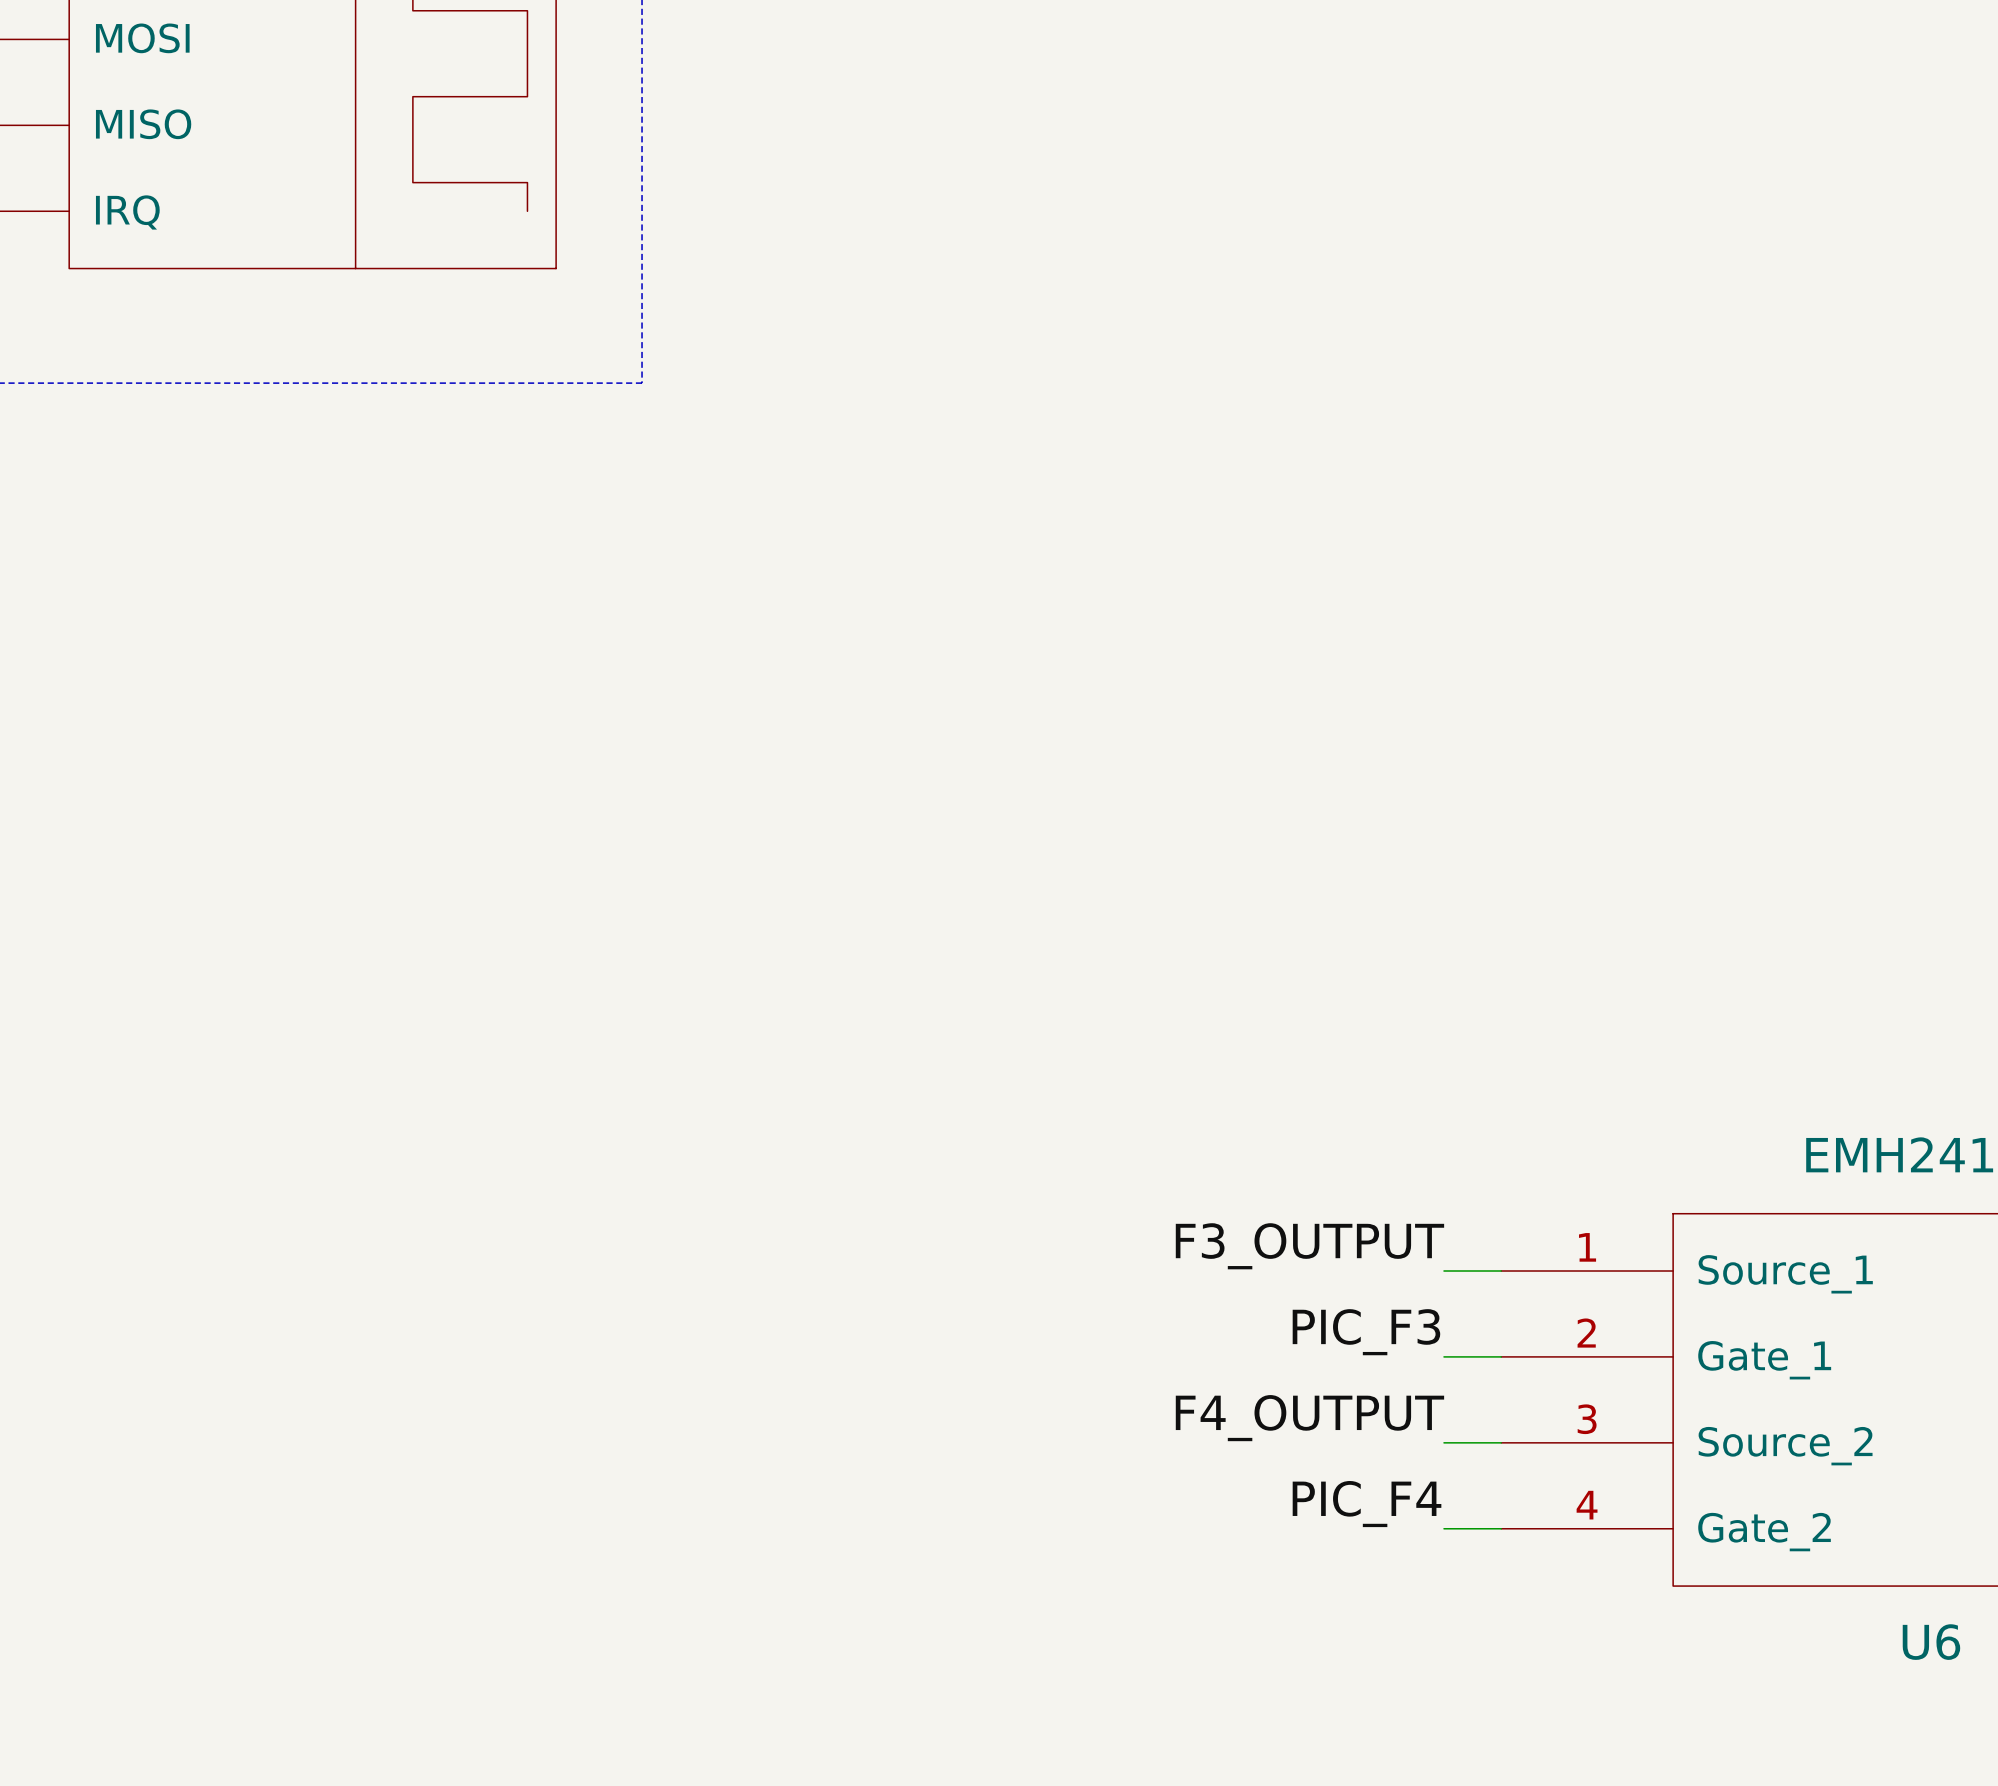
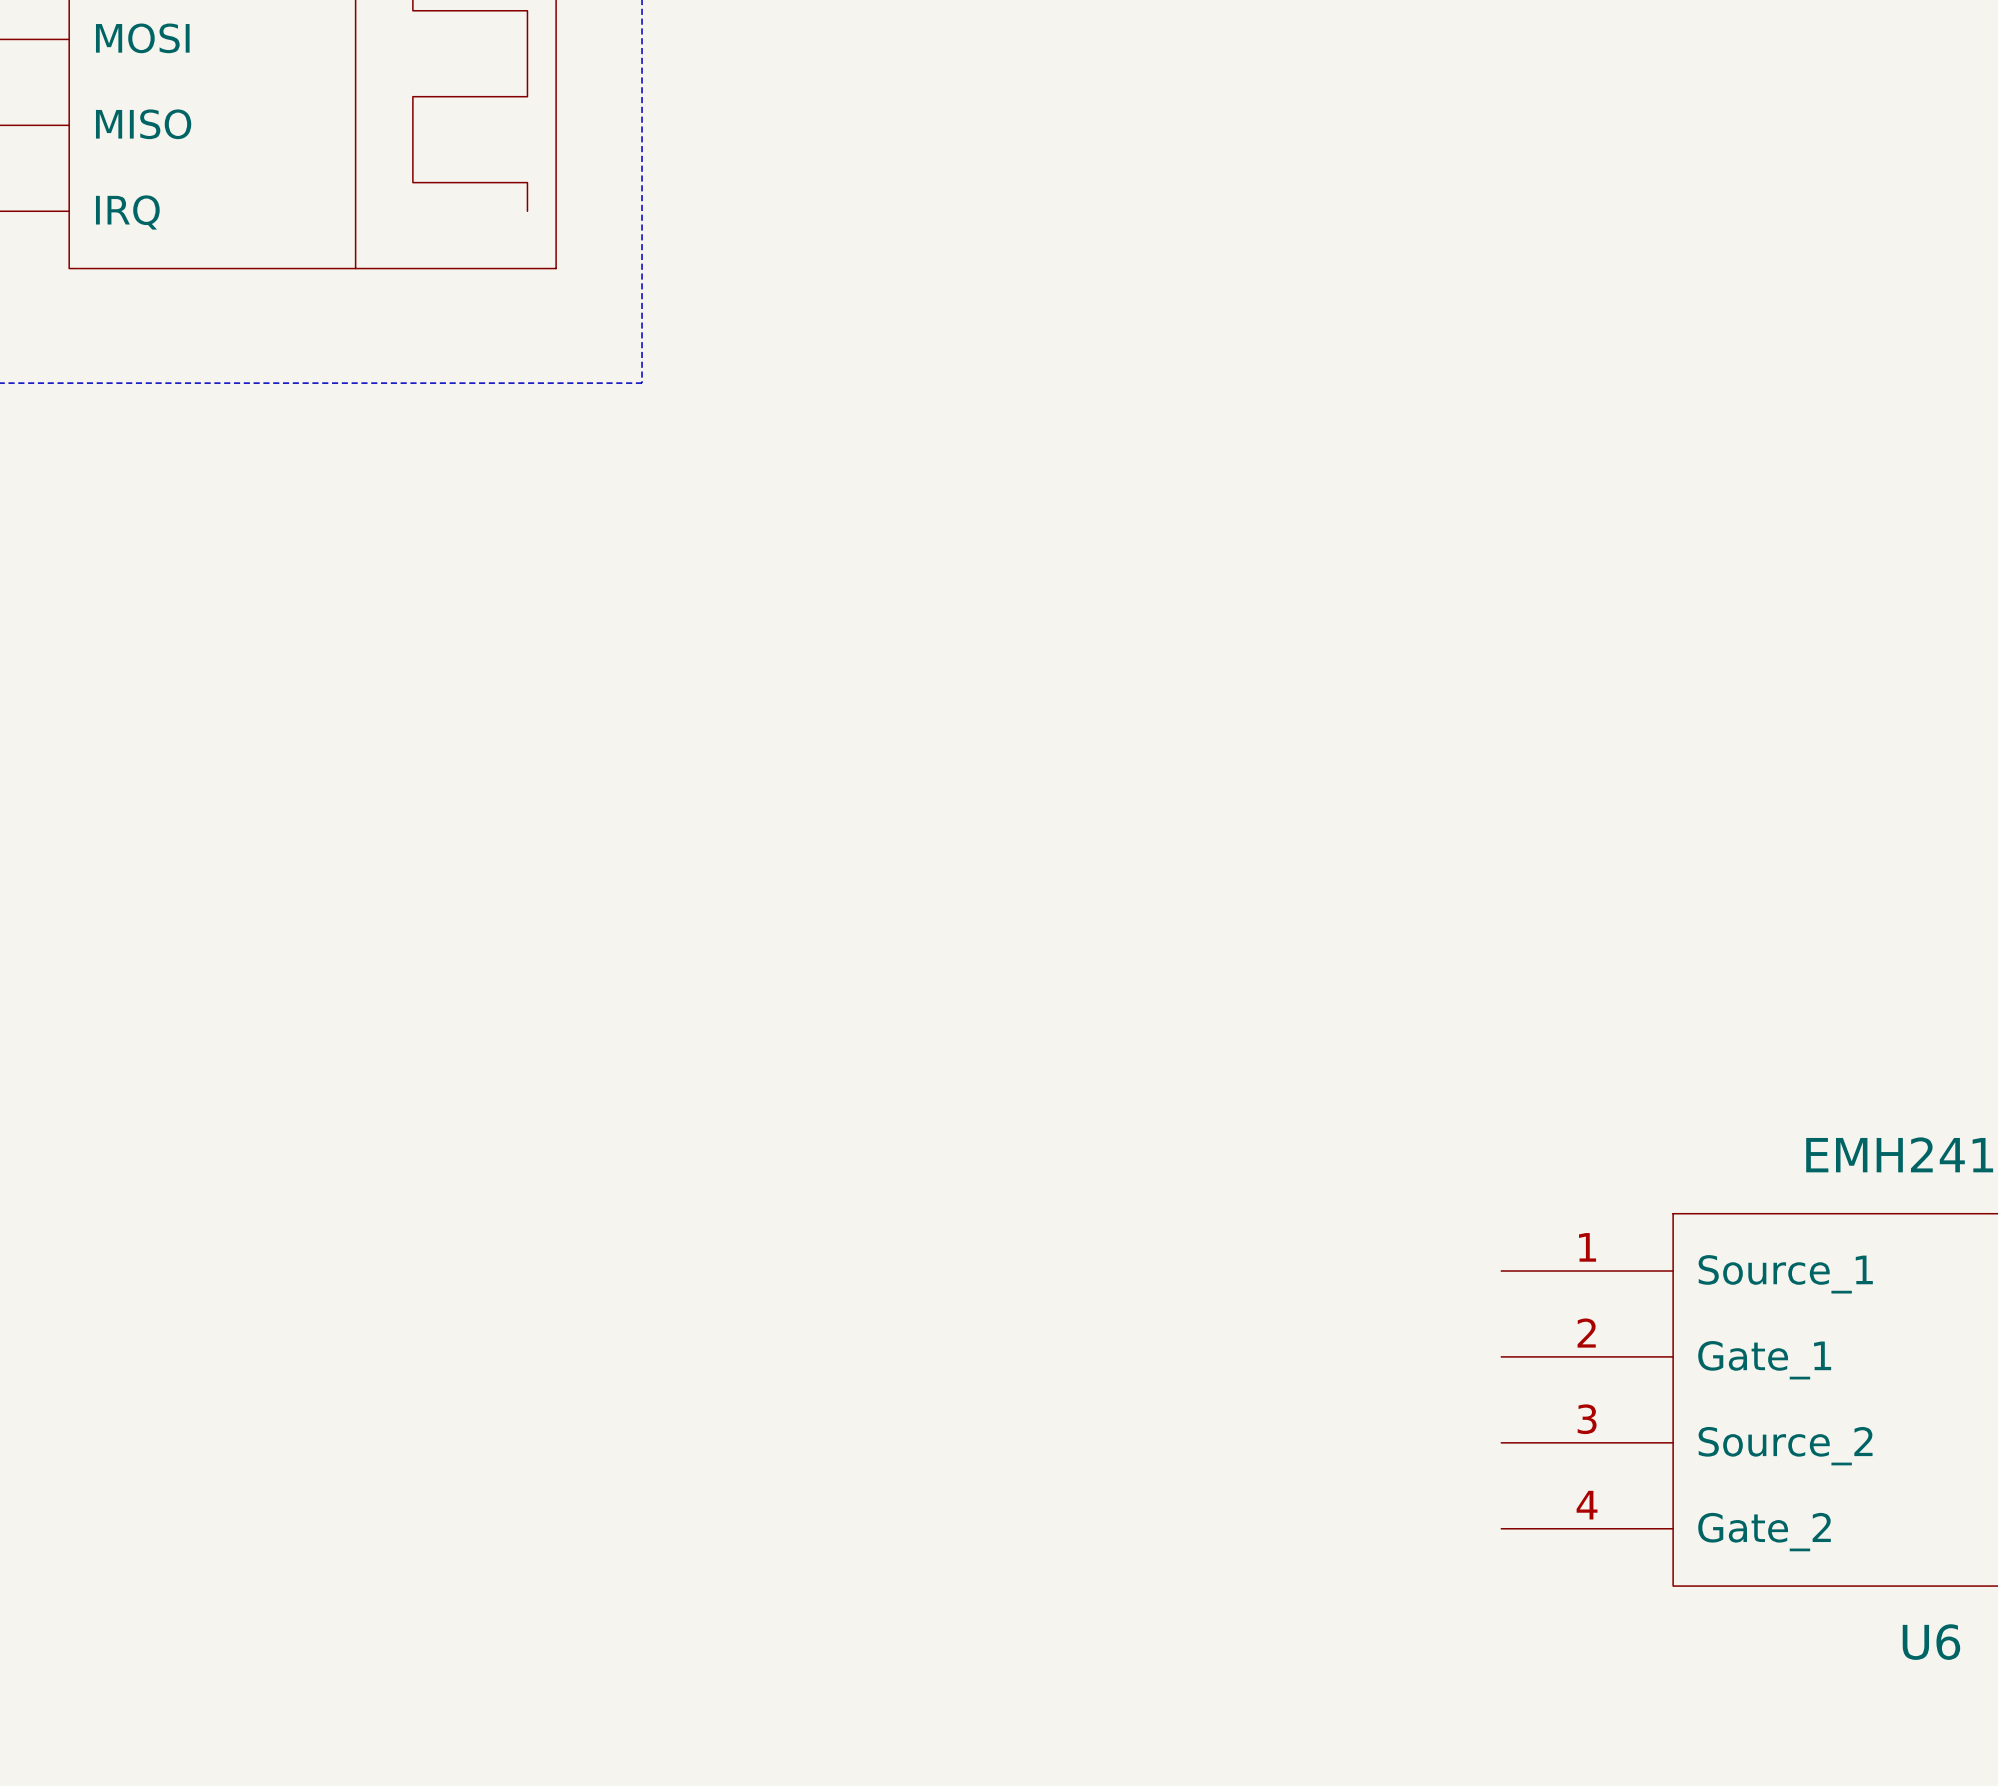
label: F3_OUTPUT (1309, 1246) -> none
wire: (1443, 1271) (1501, 1271) -> none
label: PIC_F3 (1366, 1332) -> none
wire: (1443, 1356) (1501, 1356) -> none
label: F4_OUTPUT (1309, 1418) -> none
wire: (1443, 1442) (1501, 1442) -> none
label: PIC_F4 (1367, 1504) -> none
wire: (1443, 1528) (1501, 1528) -> none

